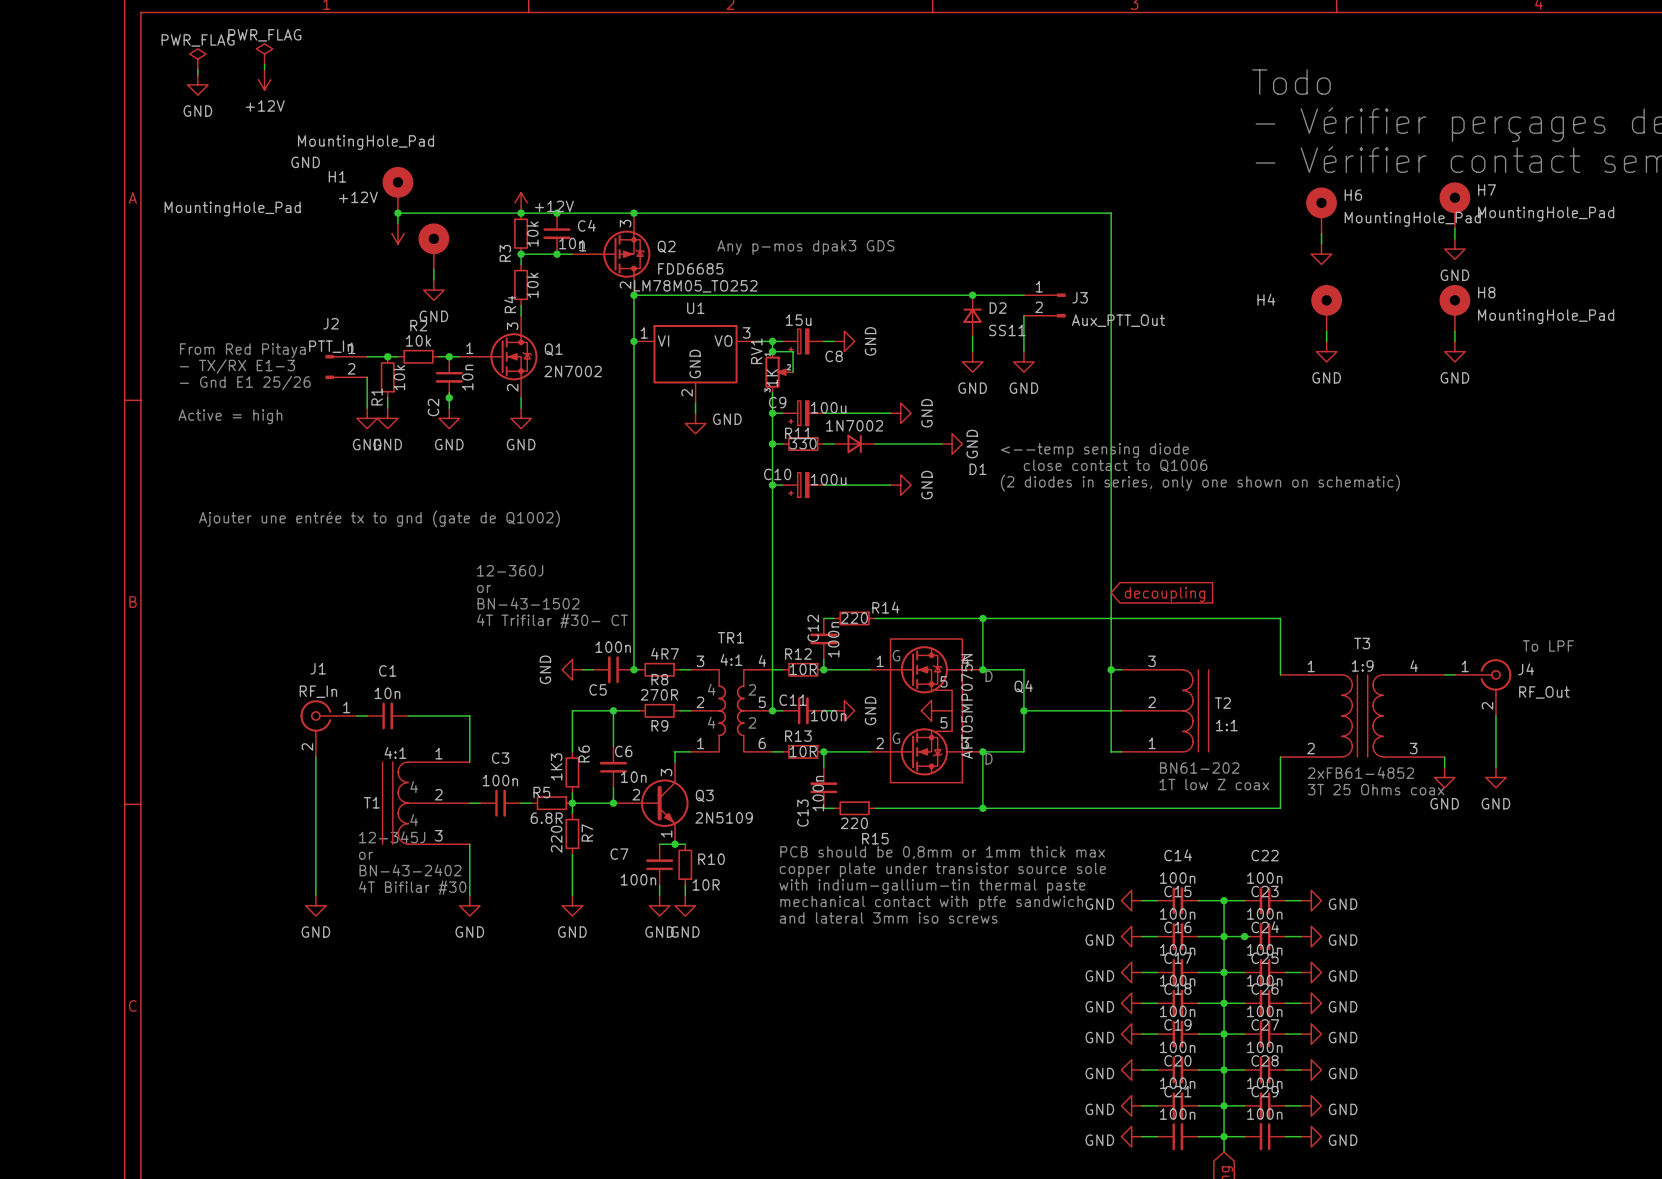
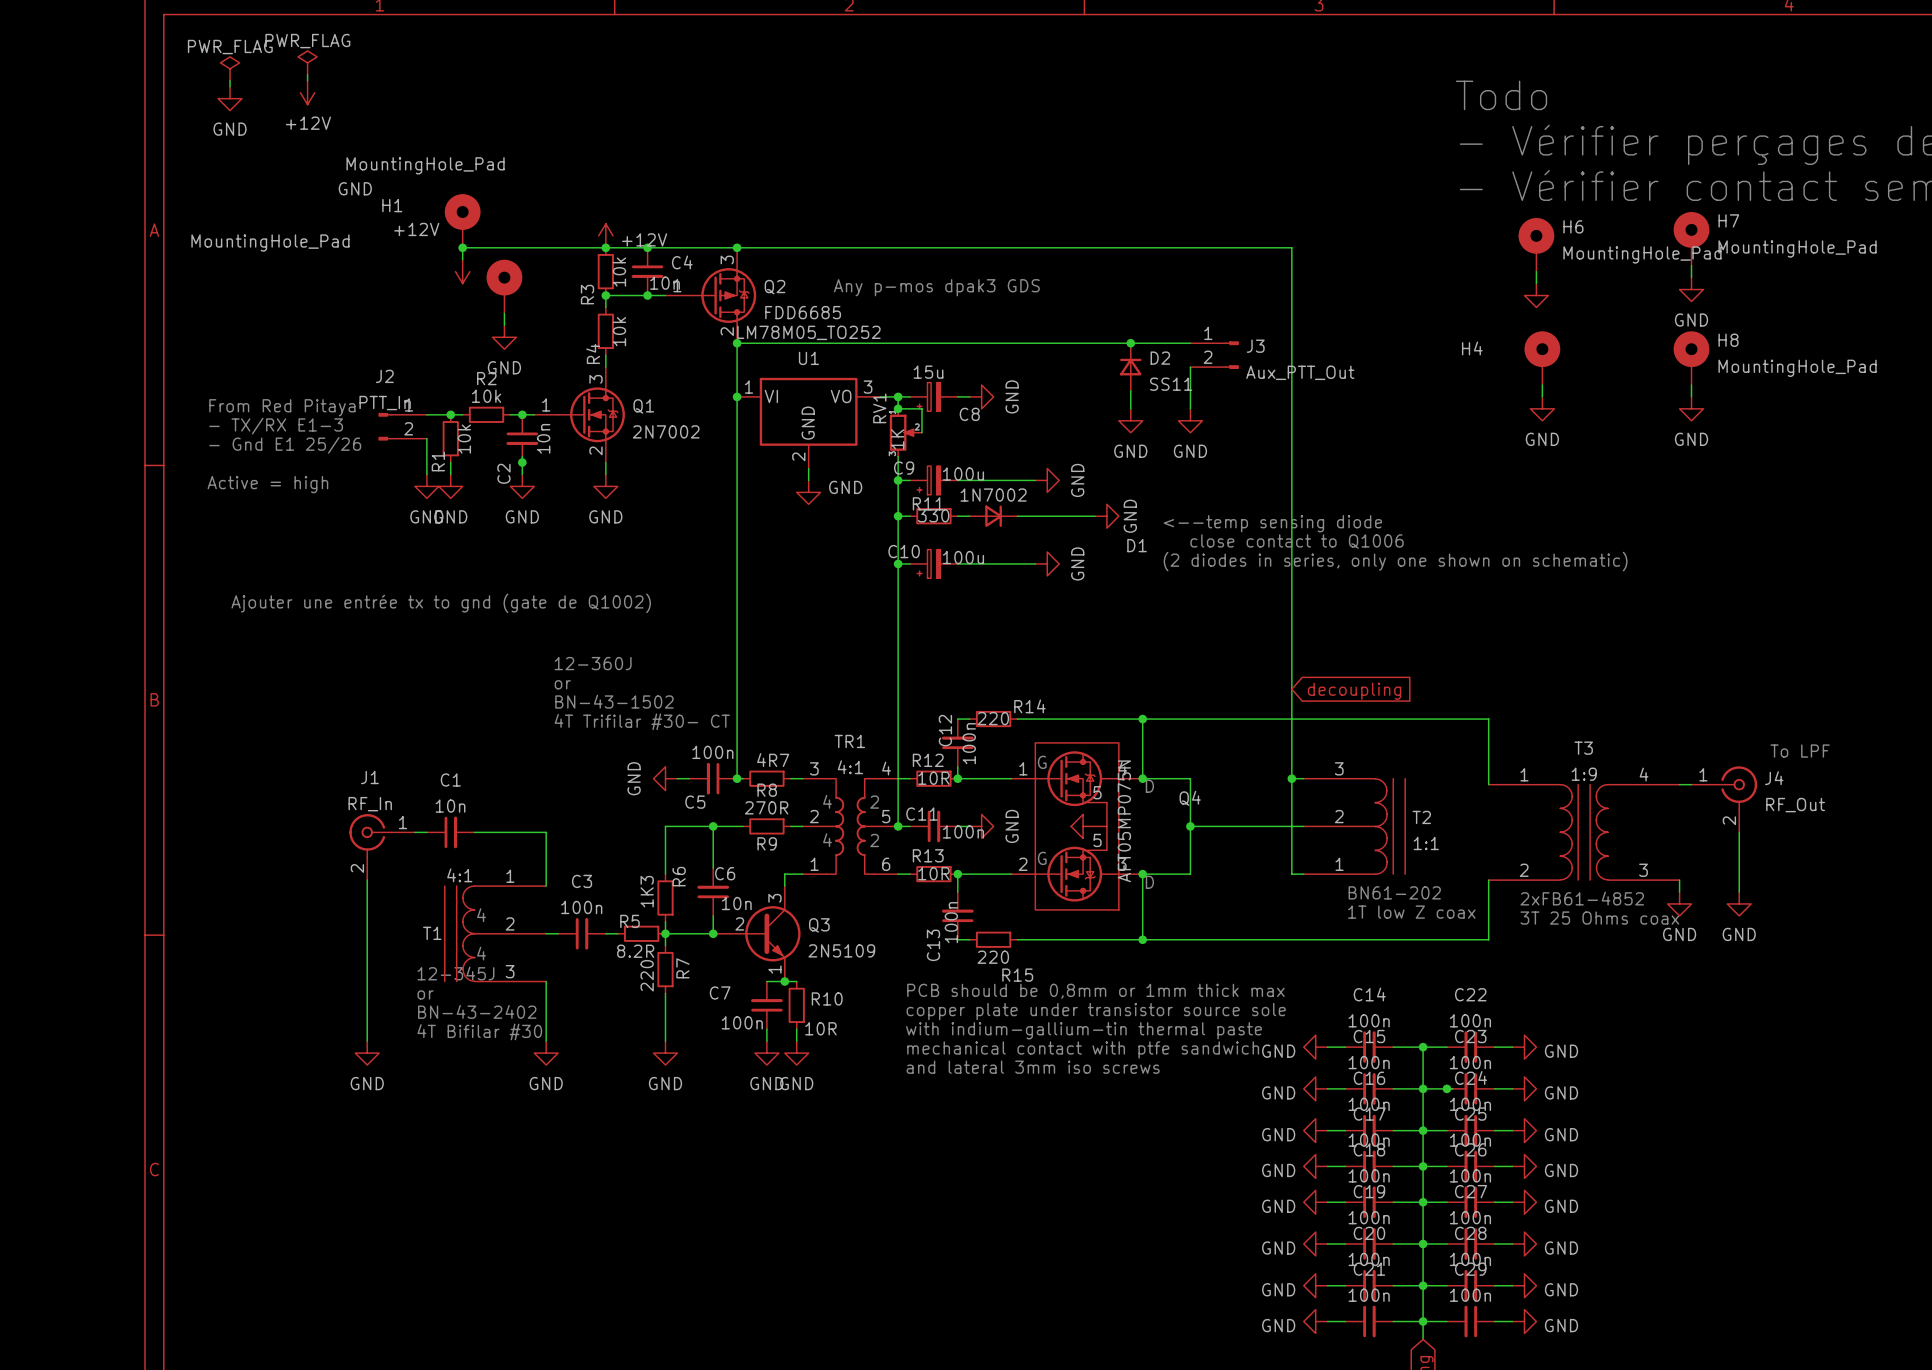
R5 value: 6.8R (546, 818) -> 8.2R (635, 951)

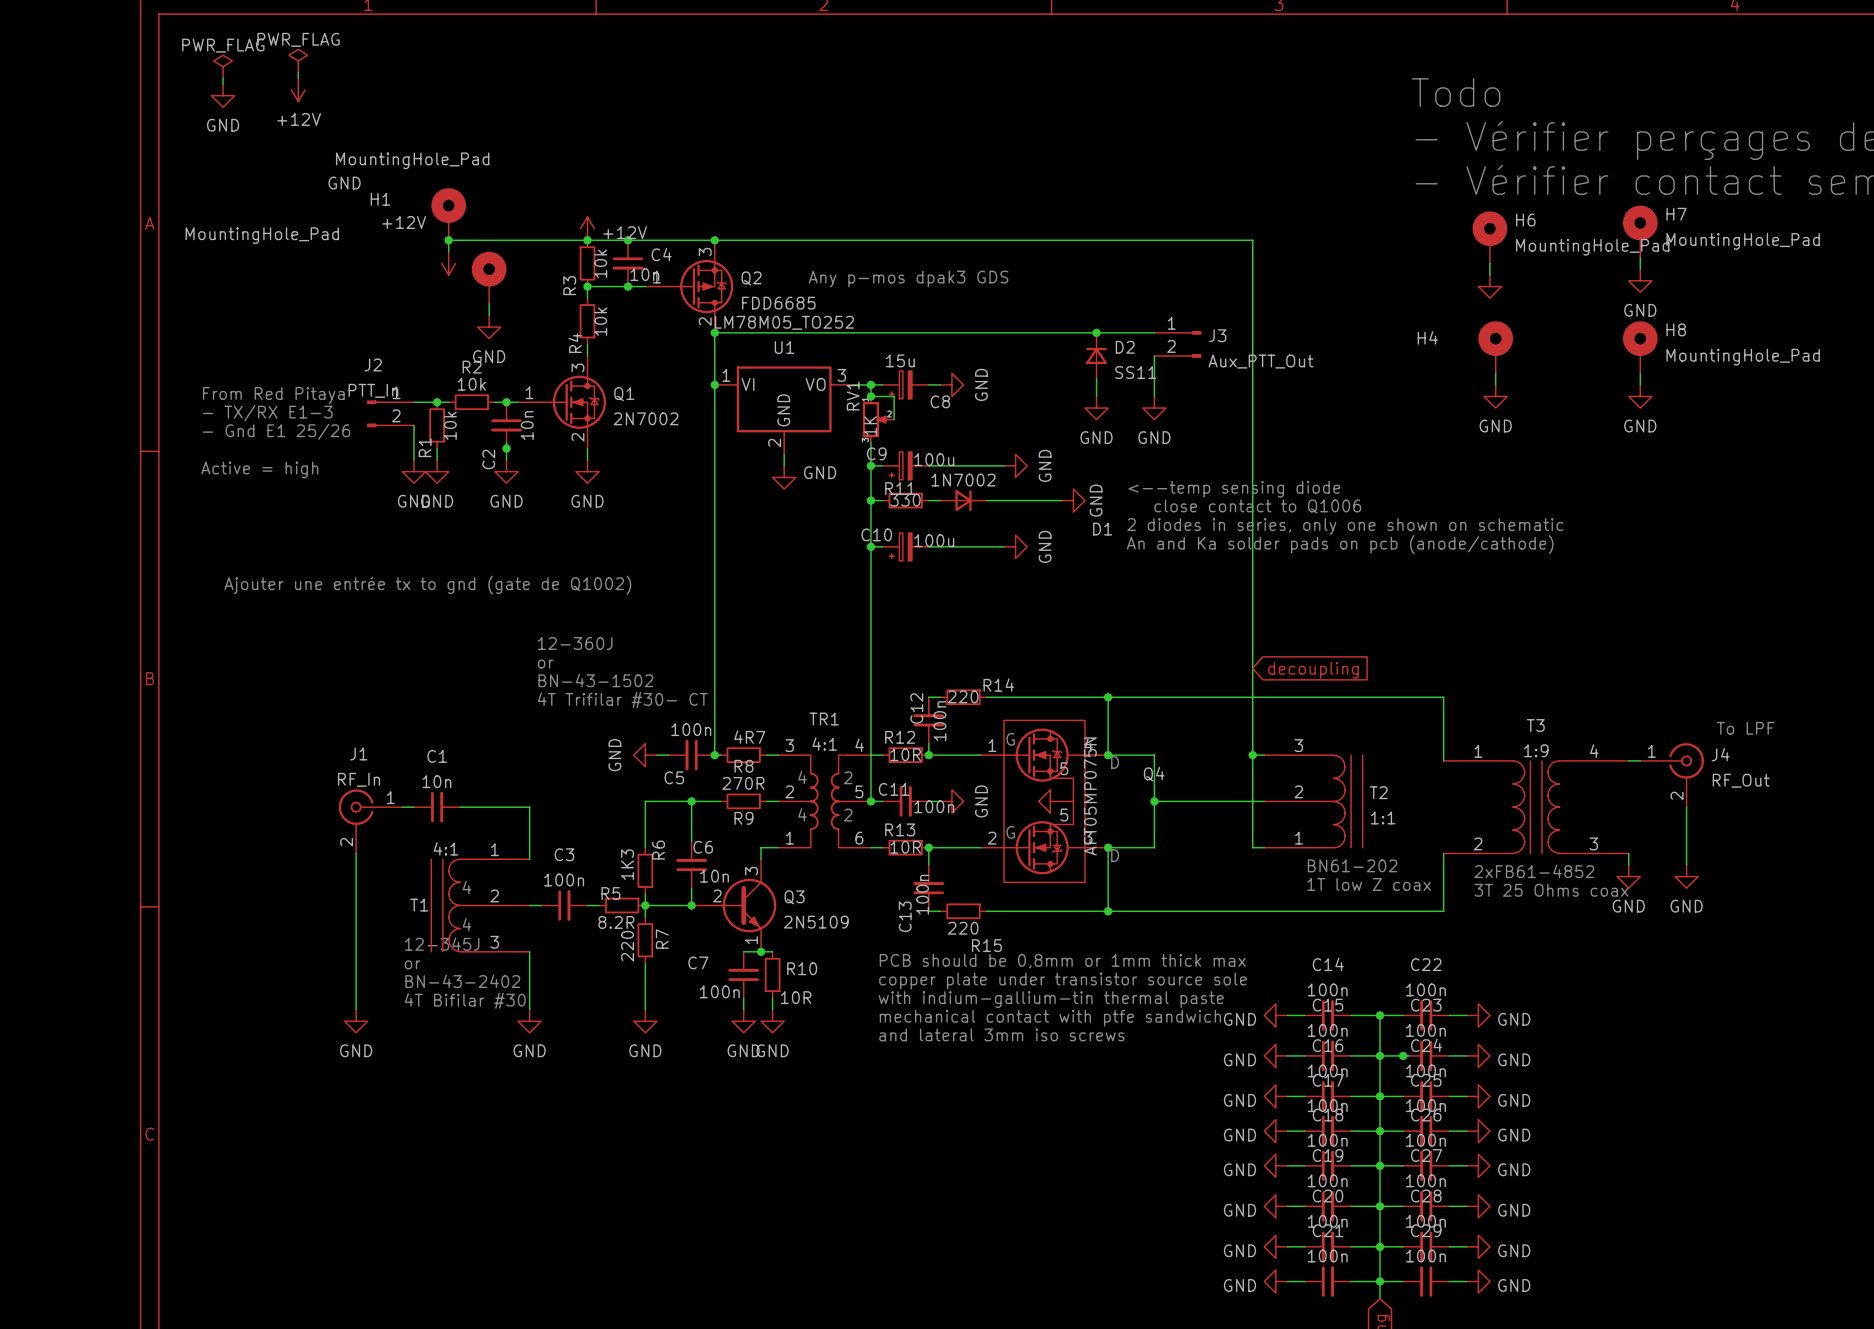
text: none -> <--temp sensing diode (1234, 489)
text: <--temp sensing diode (1272, 523) -> close contact to Q1006 (1257, 506)
text: close contact to Q1006 (1297, 541) -> 2 diodes in series, only one shown on schematic (1345, 526)
text: (2 diodes in series, only one shown on schematic) (1395, 561) -> An and Ka solder pads on pcb (anode/cathode) (1340, 544)

